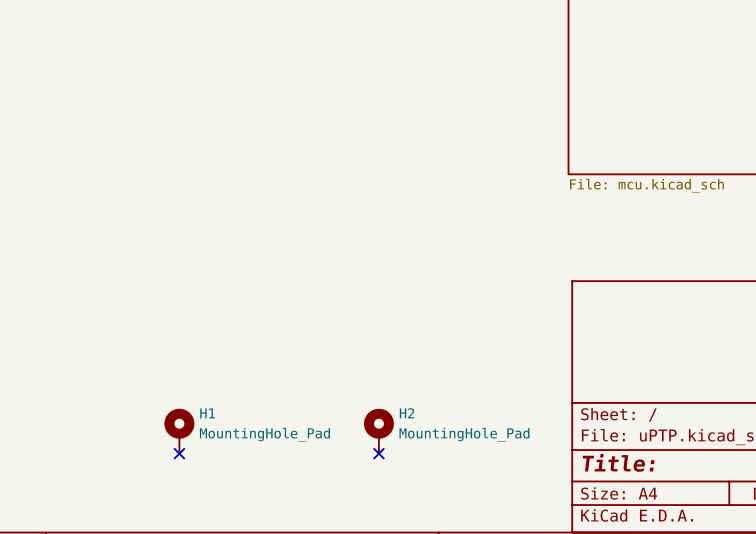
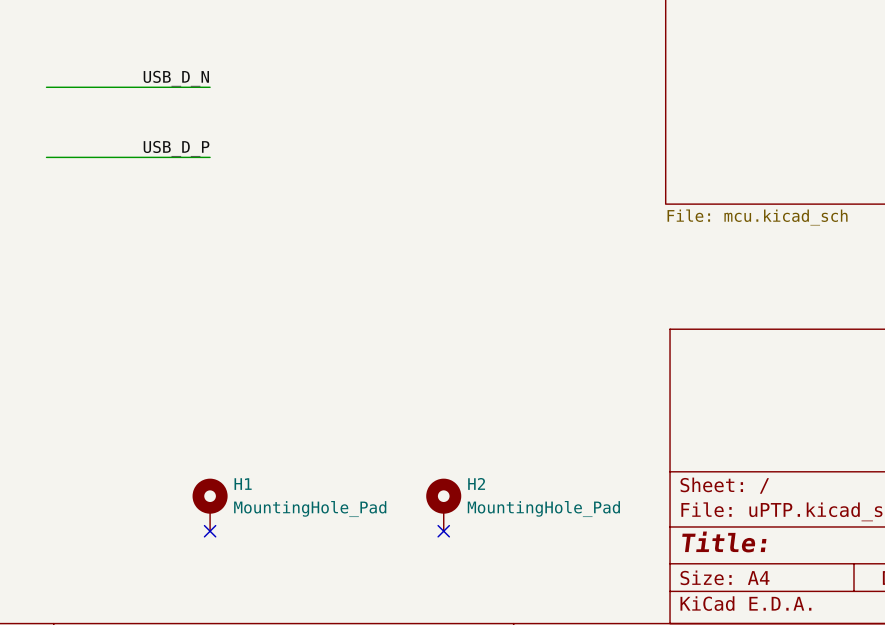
label: none -> USB_D_N (176, 78)
wire: none -> (46, 87) (210, 87)
label: none -> USB_D_P (176, 148)
wire: none -> (46, 157) (210, 157)

